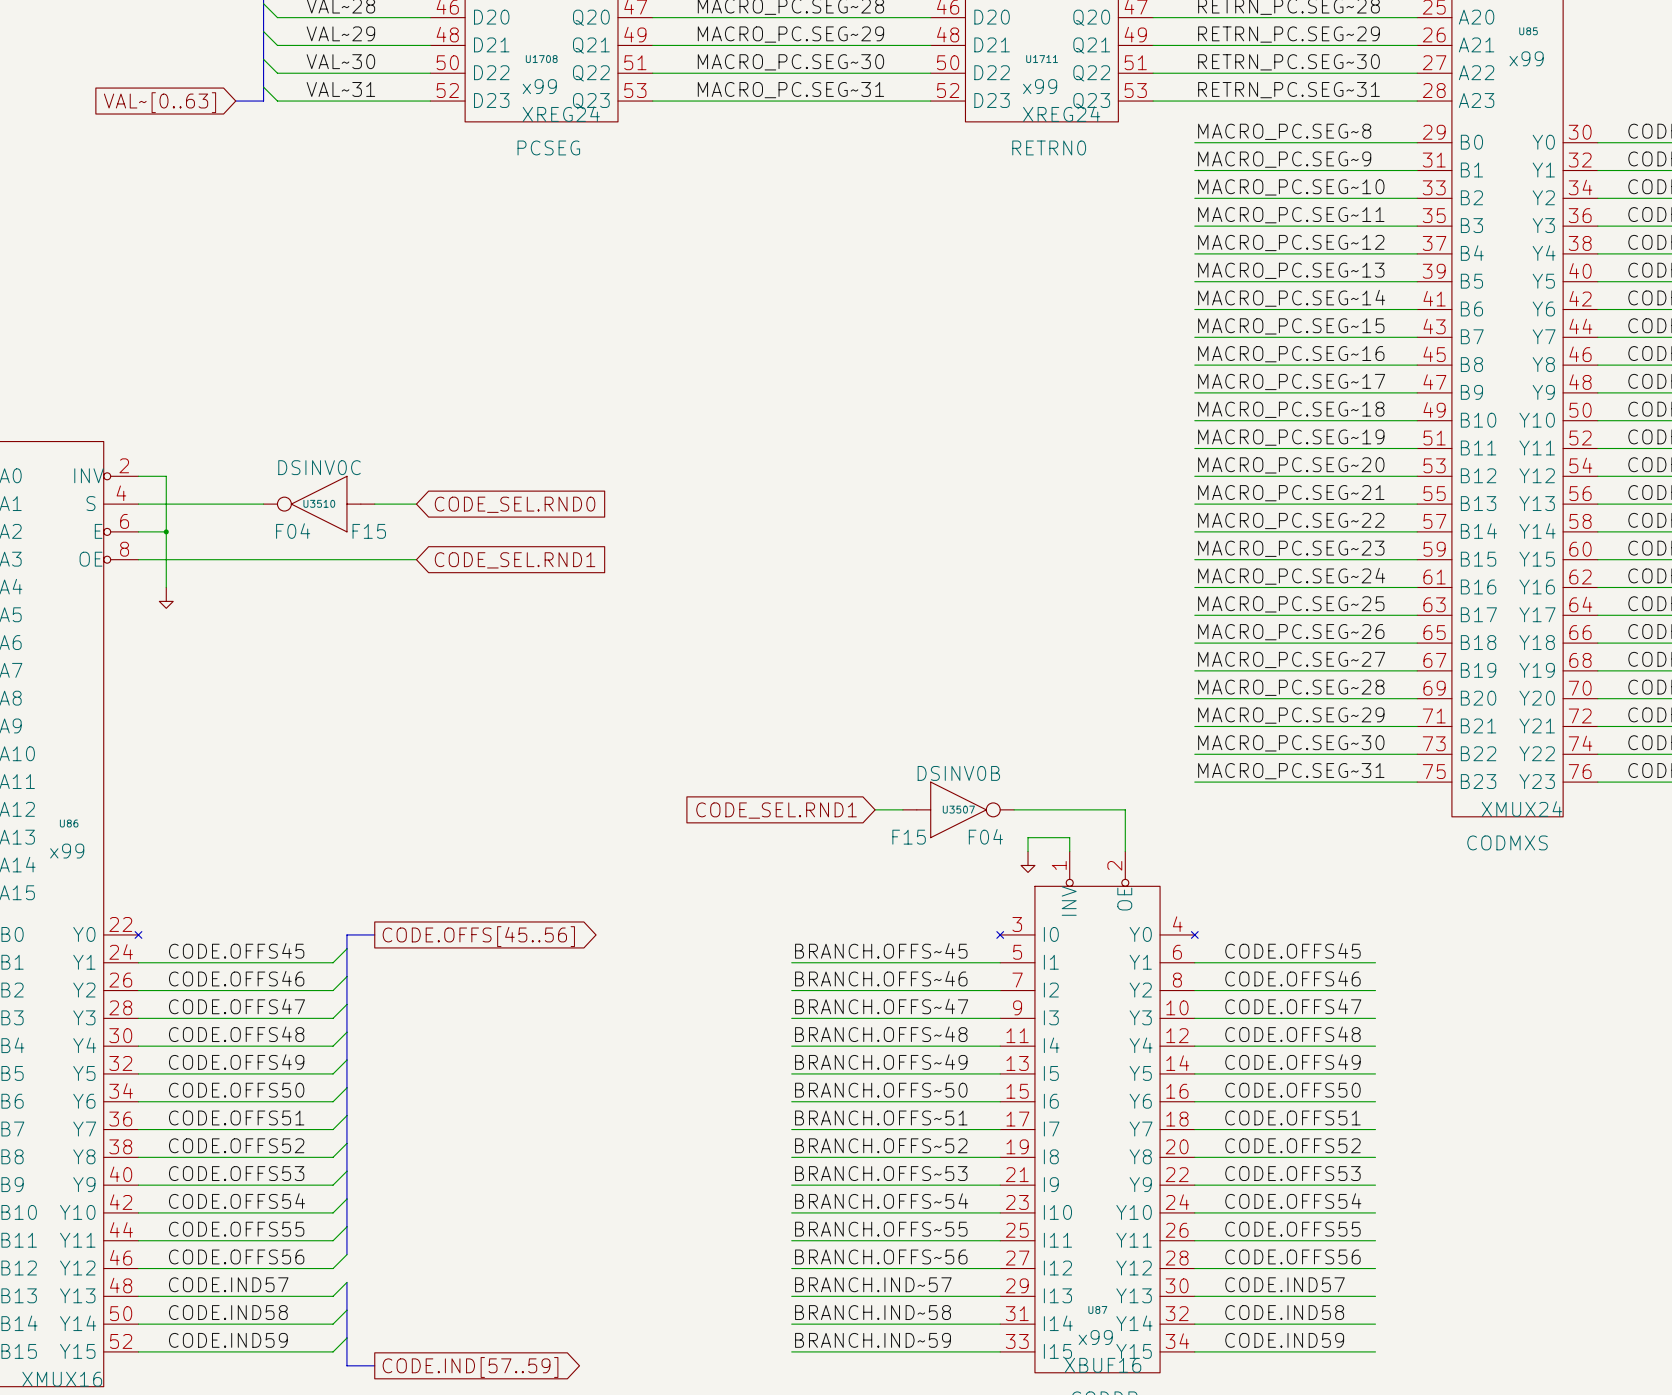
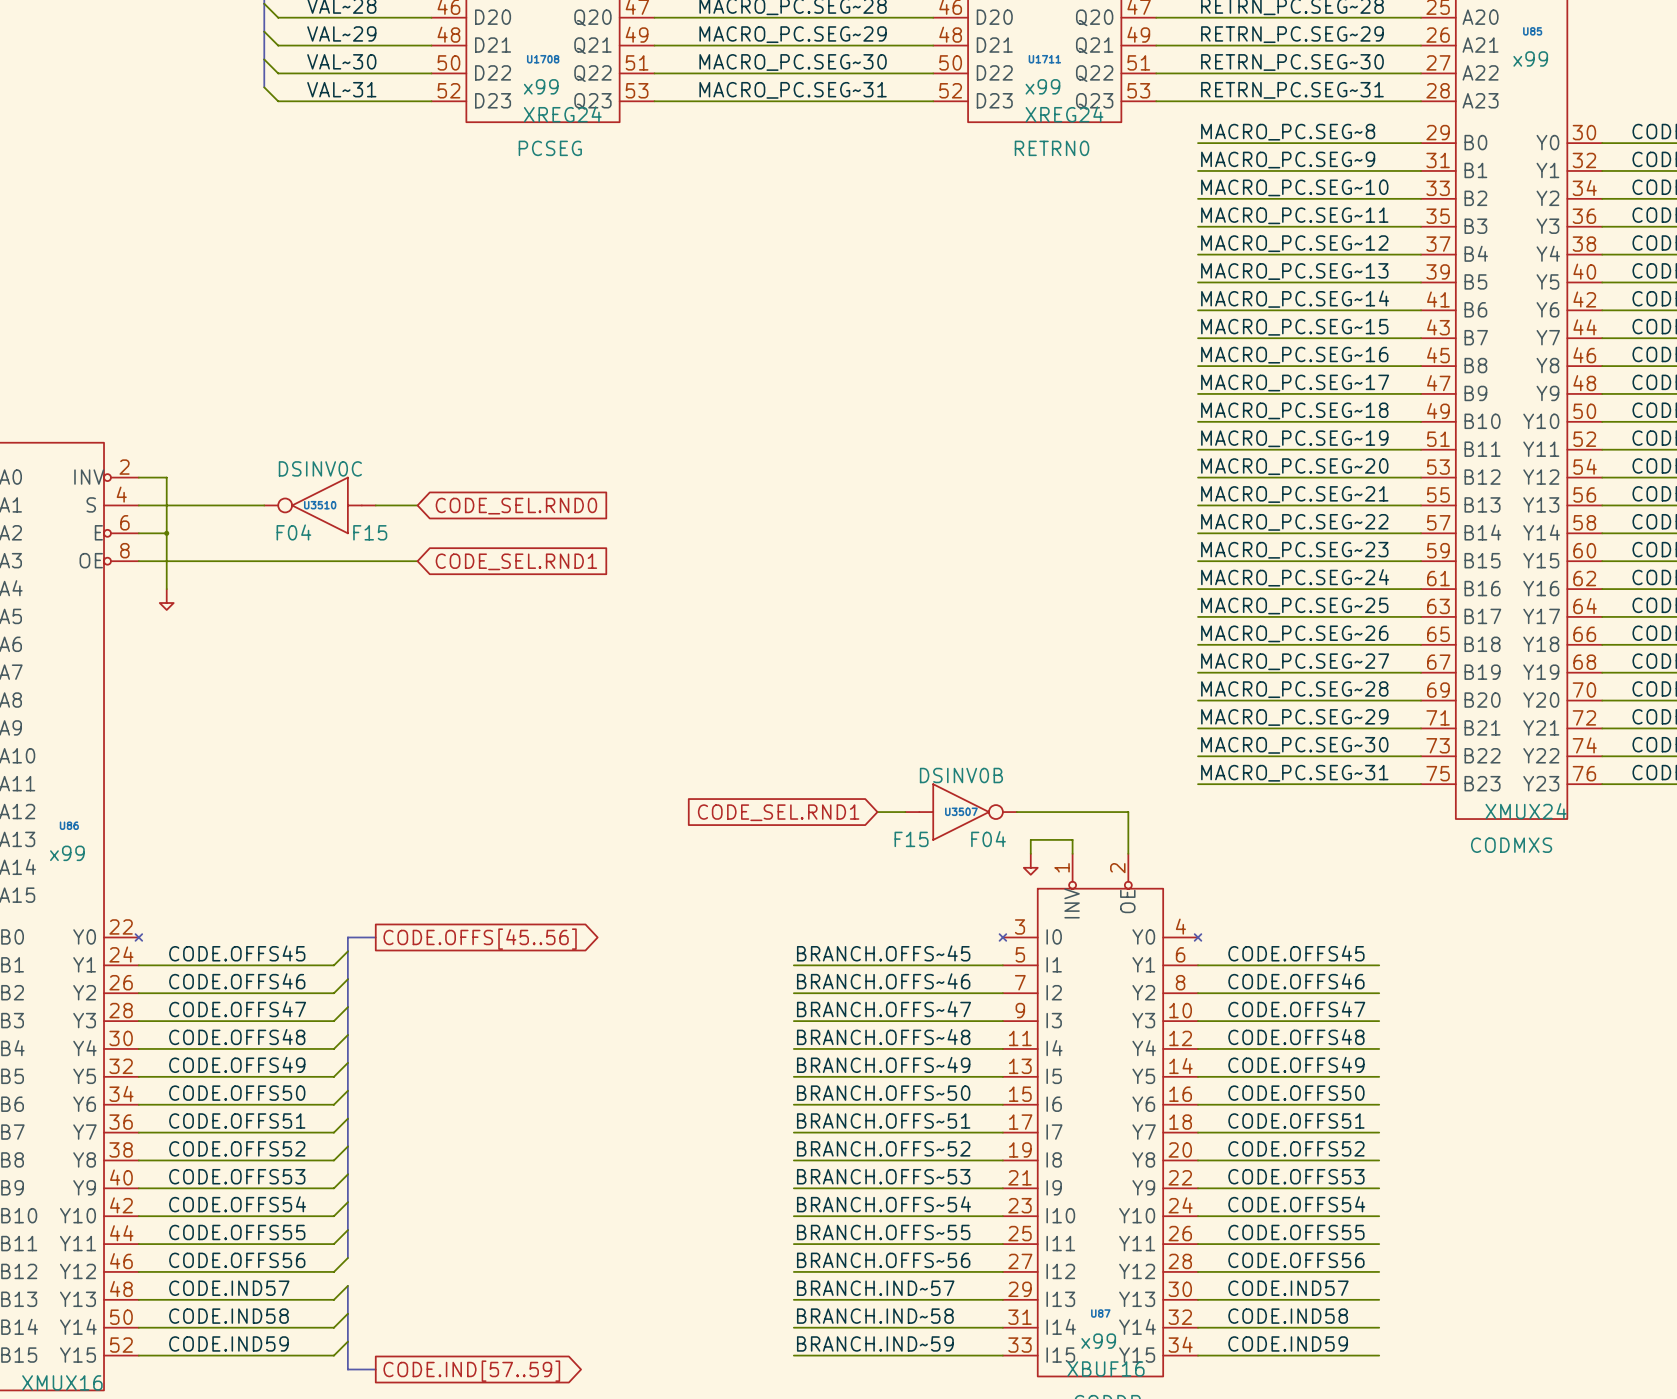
bus: (263, 87) (263, 101) (235, 101) -> none
global label: VAL~[0..63] (160, 102) -> none

